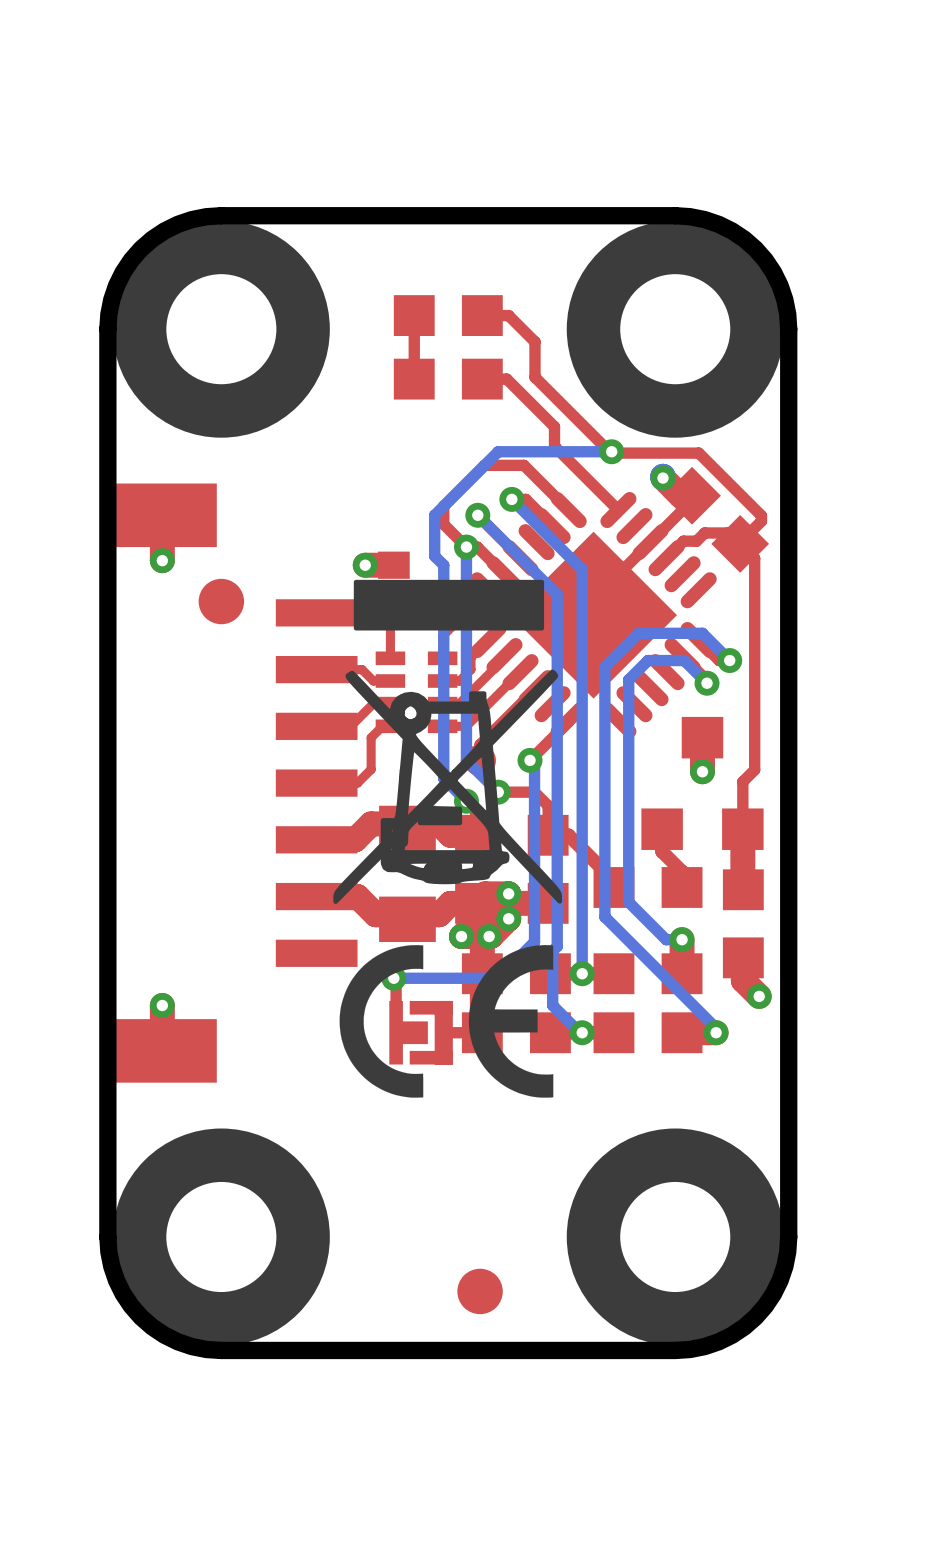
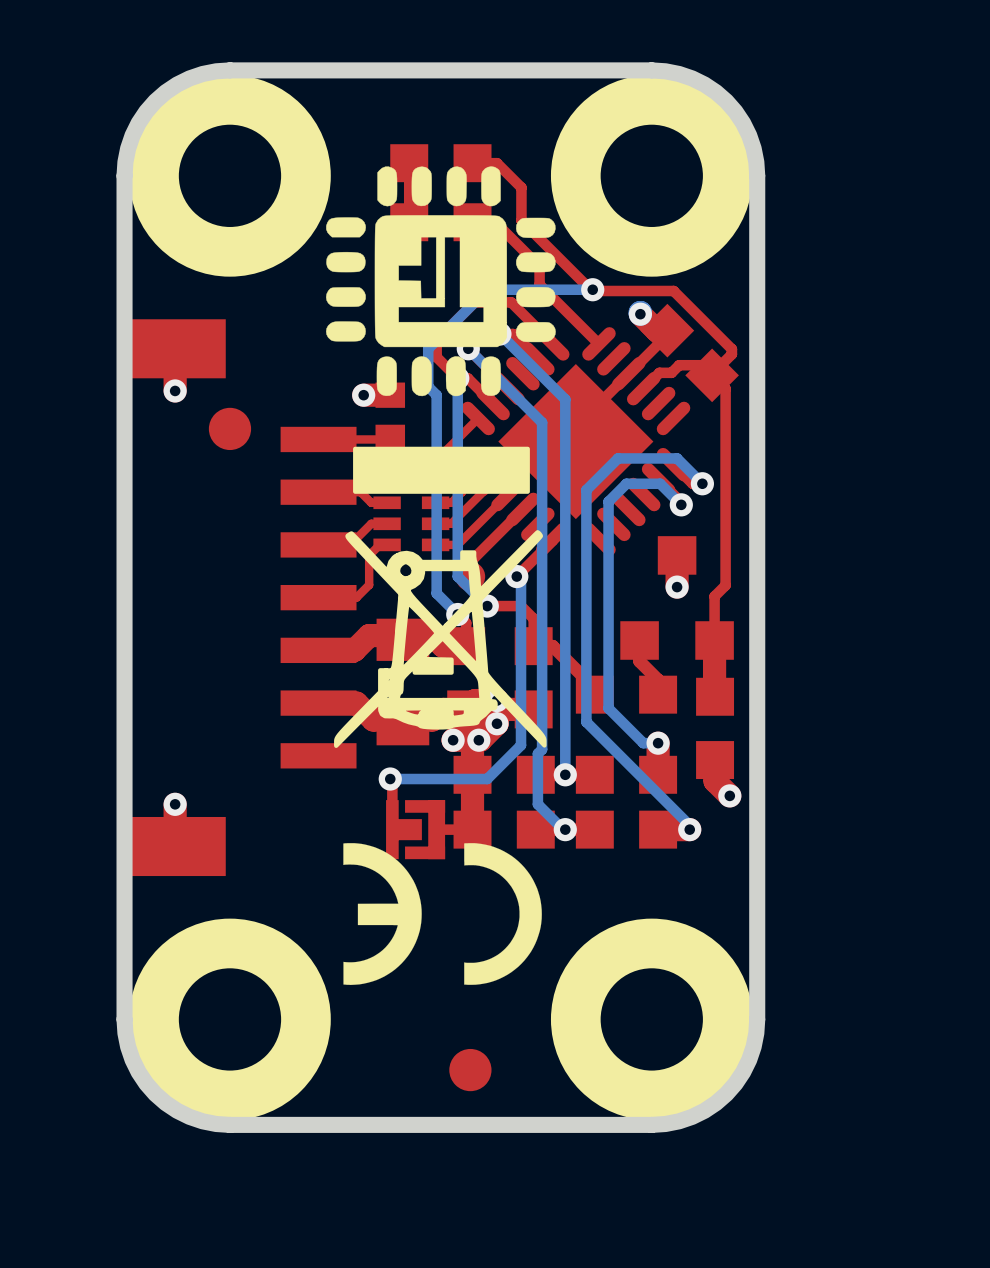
drawing: none -> [325, 166, 556, 397]
drawing position: (447, 741) -> (440, 597)
drawing: [339, 945, 554, 1098] -> none
drawing: none -> [343, 843, 542, 985]

